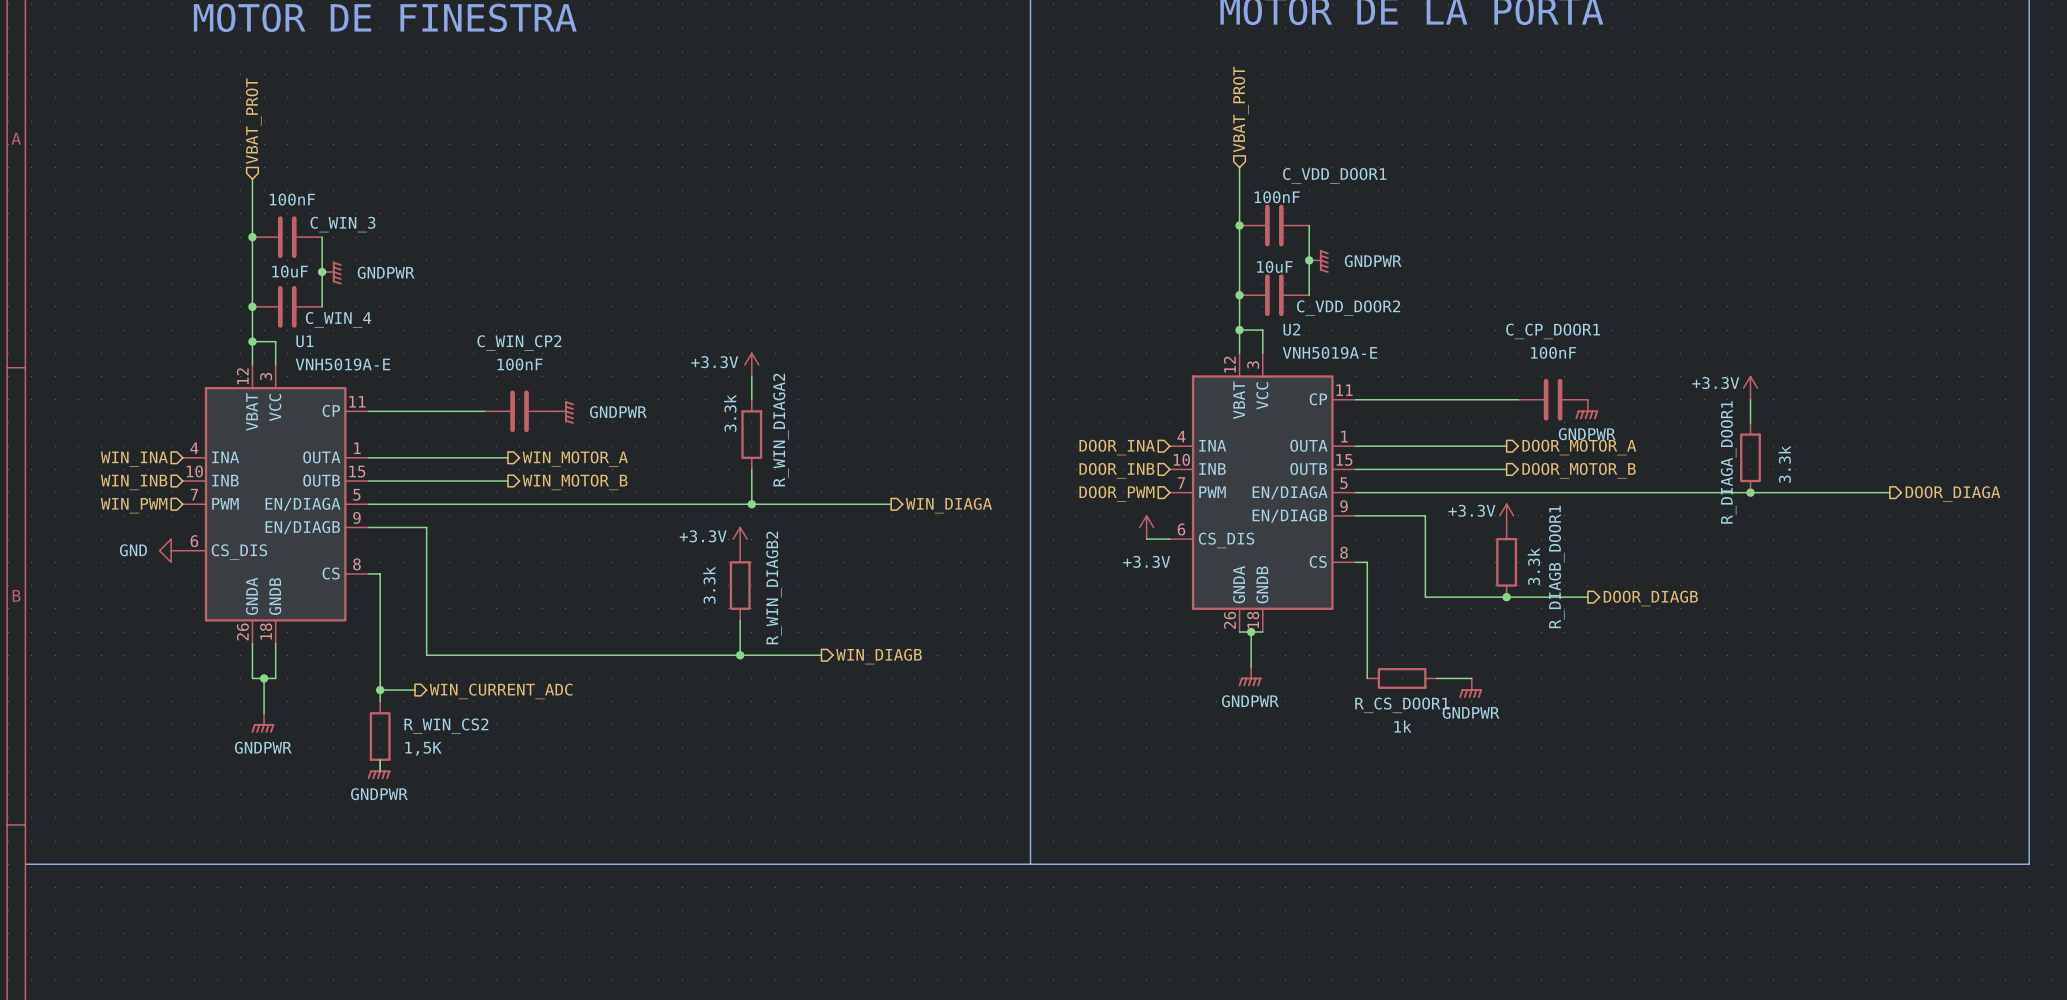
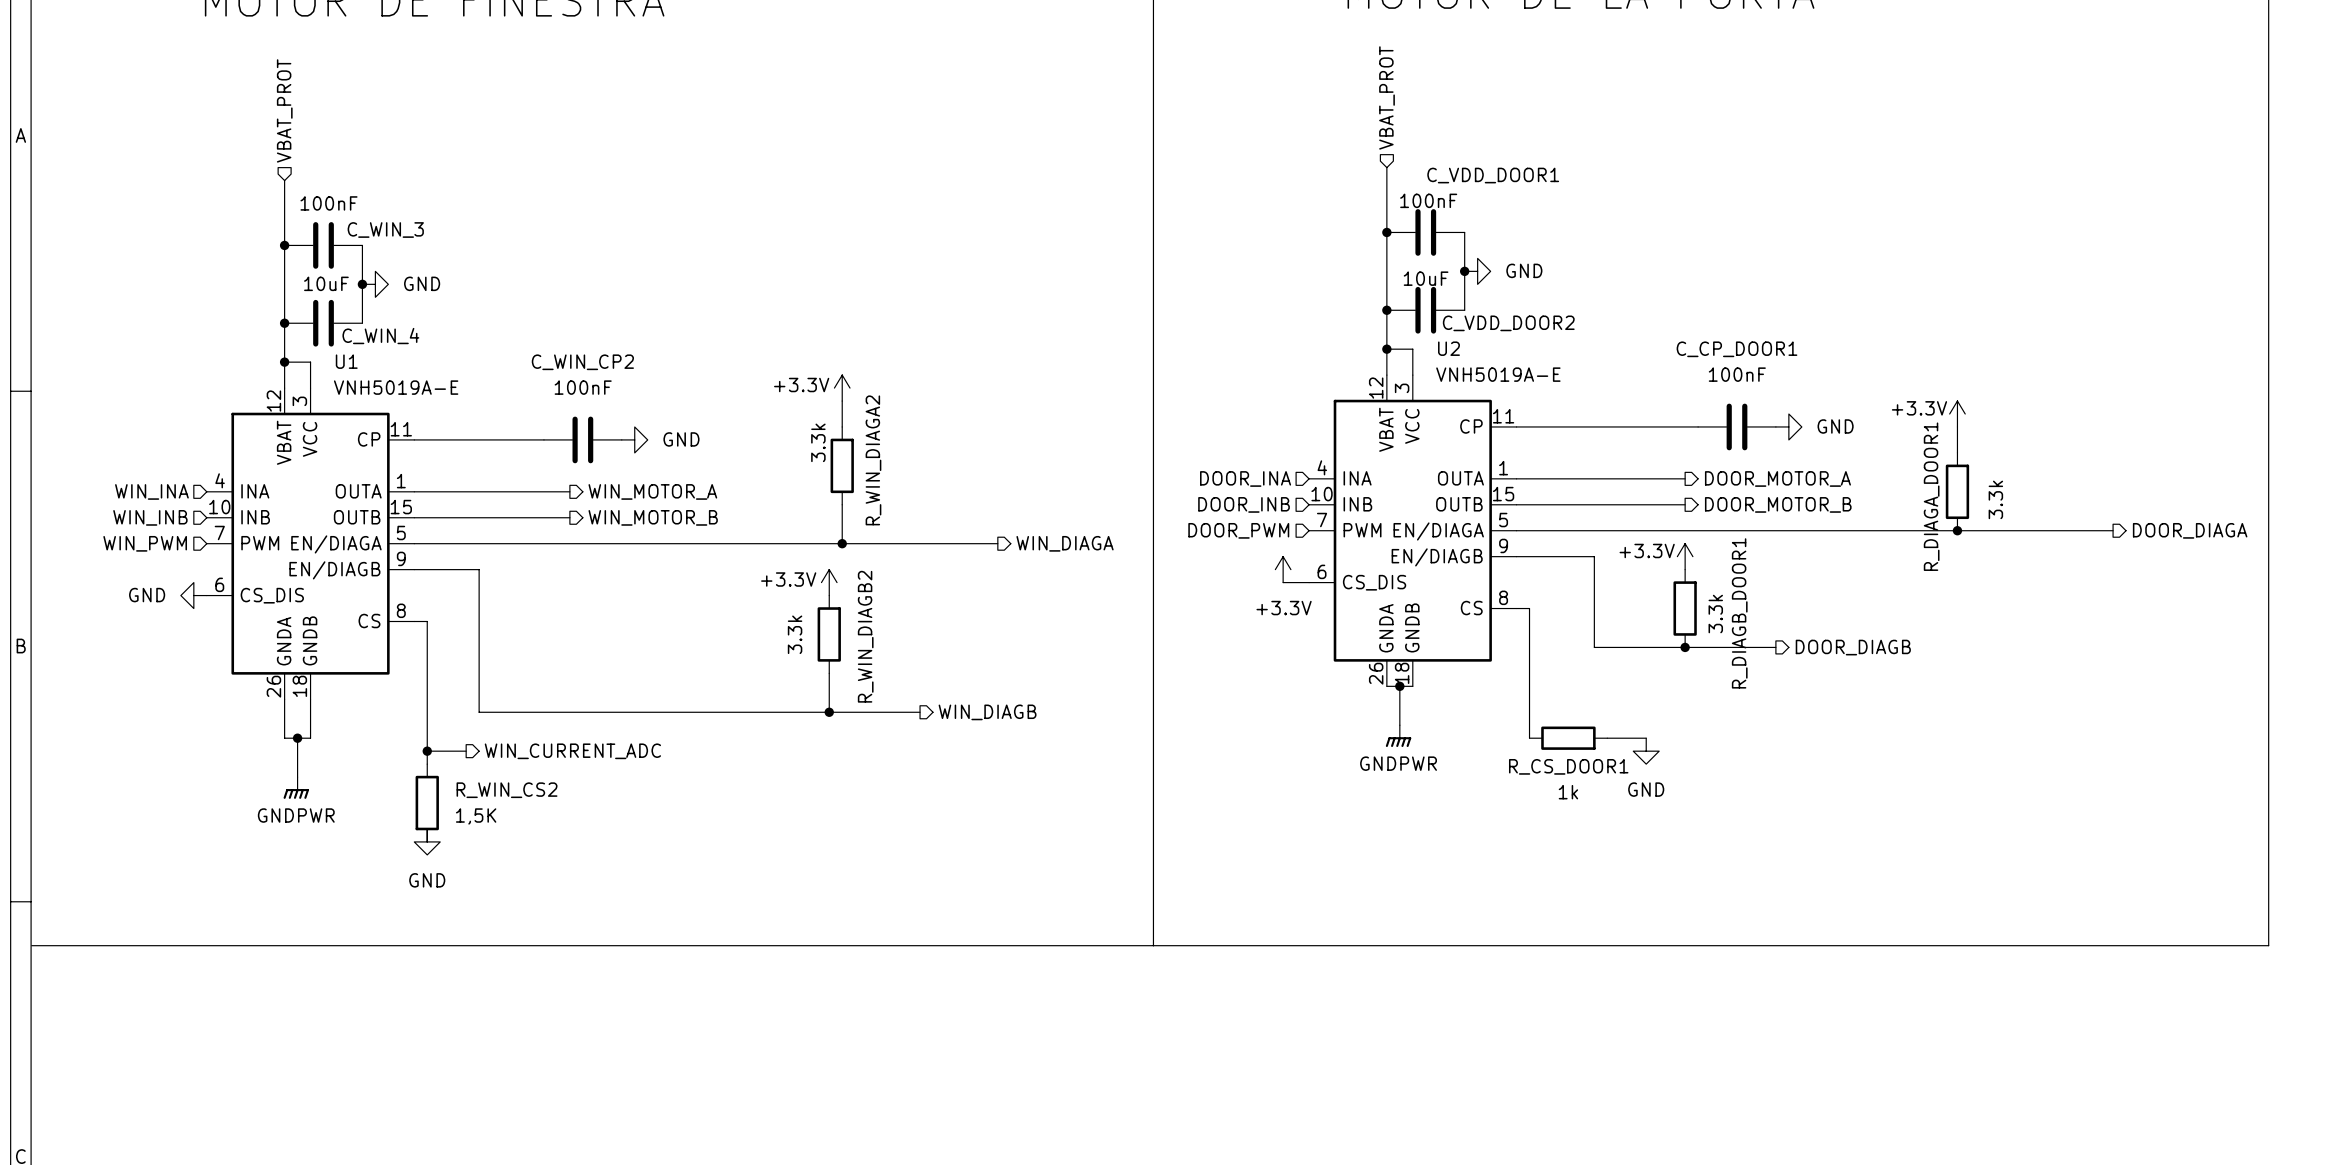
power symbol: GNDPWR (1318, 261) -> GND (1477, 271)
power symbol: GNDPWR (331, 273) -> GND (375, 284)
power symbol: none -> GND (1788, 426)
power symbol: GNDPWR (1586, 409) -> none
power symbol: GNDPWR (564, 412) -> GND (634, 439)
power symbol: GNDPWR (1470, 688) -> GND (1646, 751)
power symbol: GNDPWR (379, 769) -> GND (427, 841)

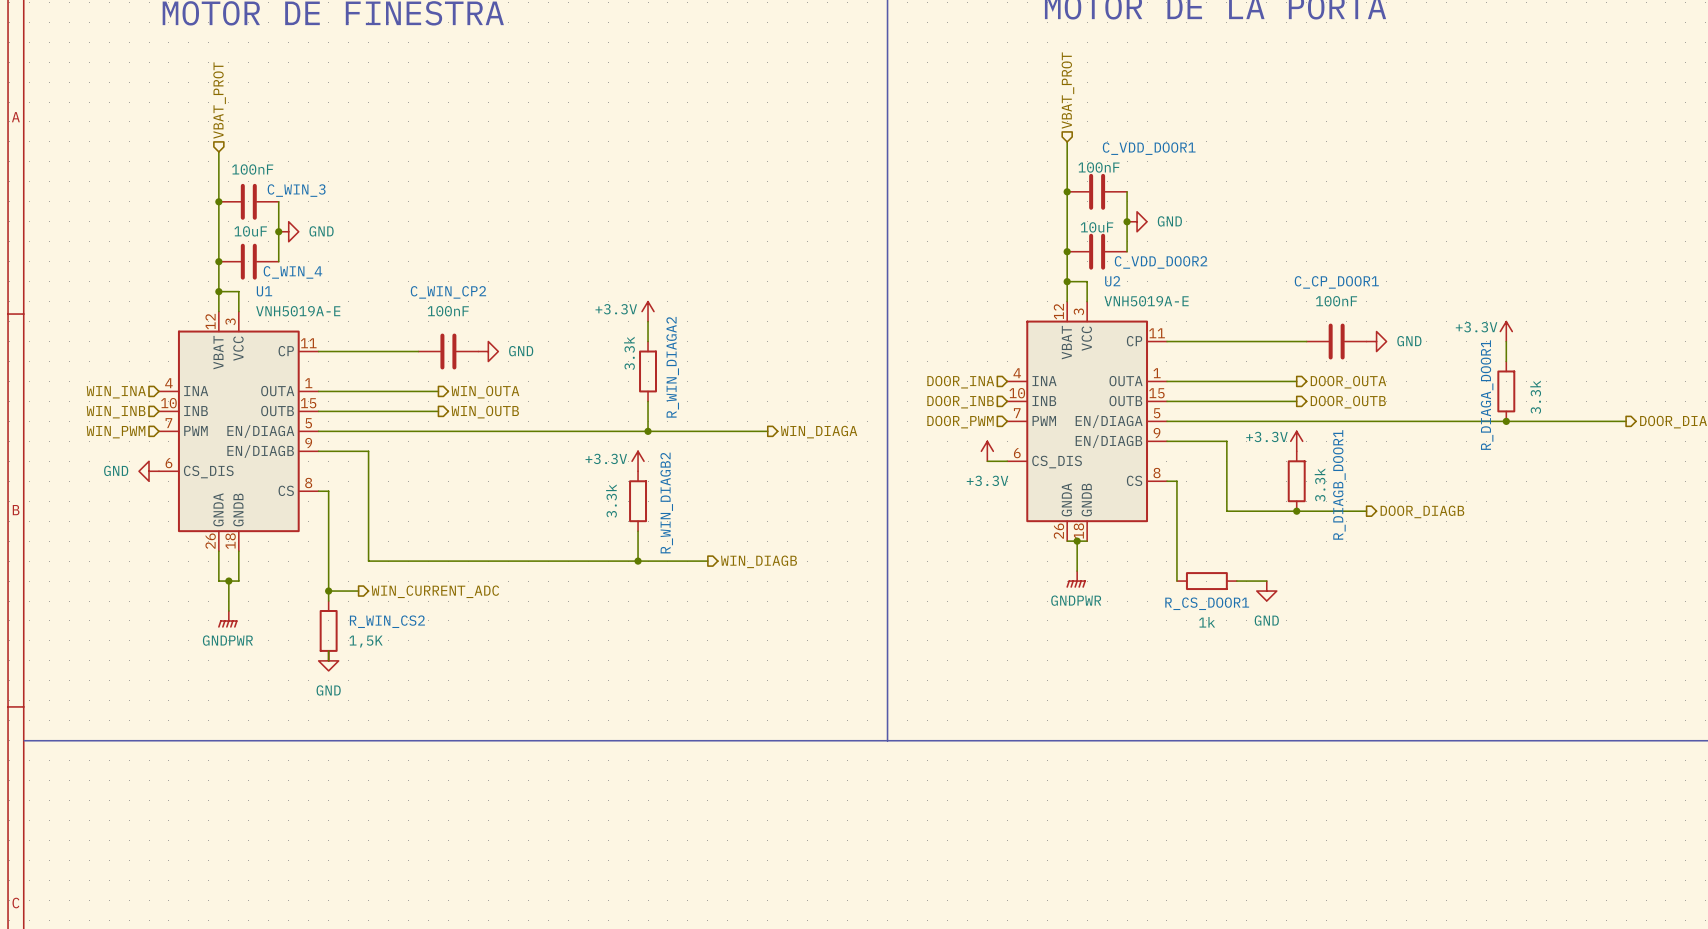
hierarchical label: DOOR_MOTOR_A (1777, 478) -> DOOR_OUTA (1348, 382)
hierarchical label: WIN_MOTOR_A (652, 491) -> WIN_OUTA (485, 392)
hierarchical label: DOOR_MOTOR_B (1778, 504) -> DOOR_OUTB (1348, 402)
hierarchical label: WIN_MOTOR_B (653, 517) -> WIN_OUTB (485, 412)

